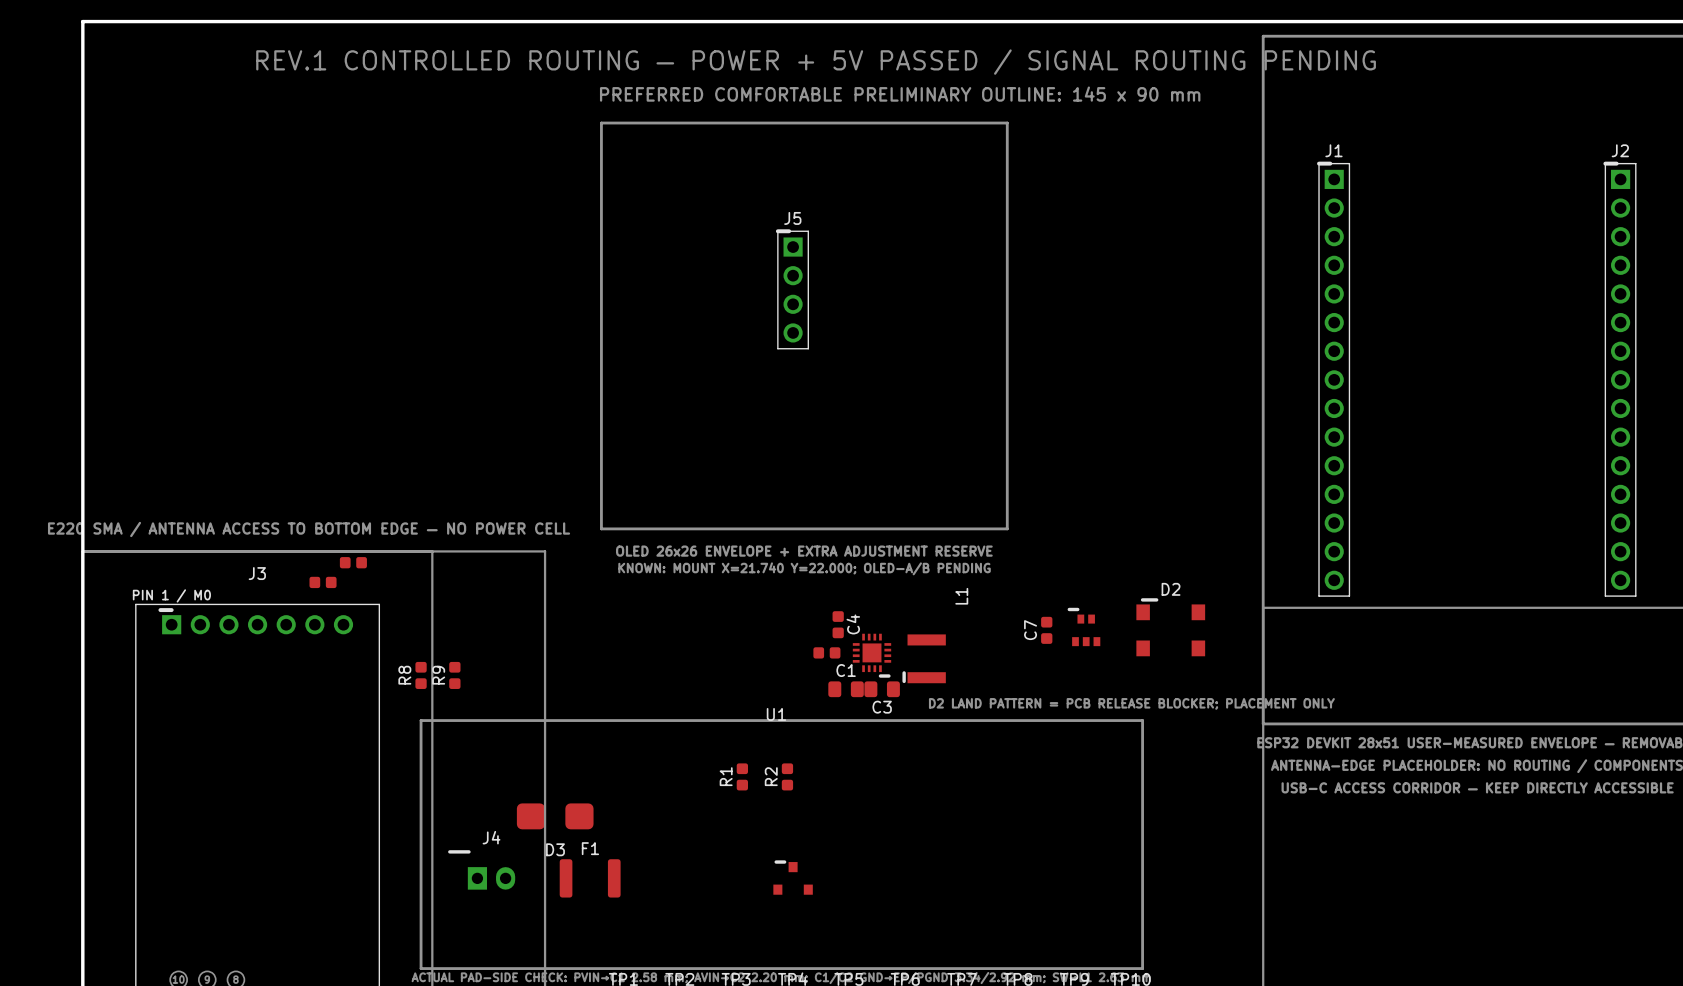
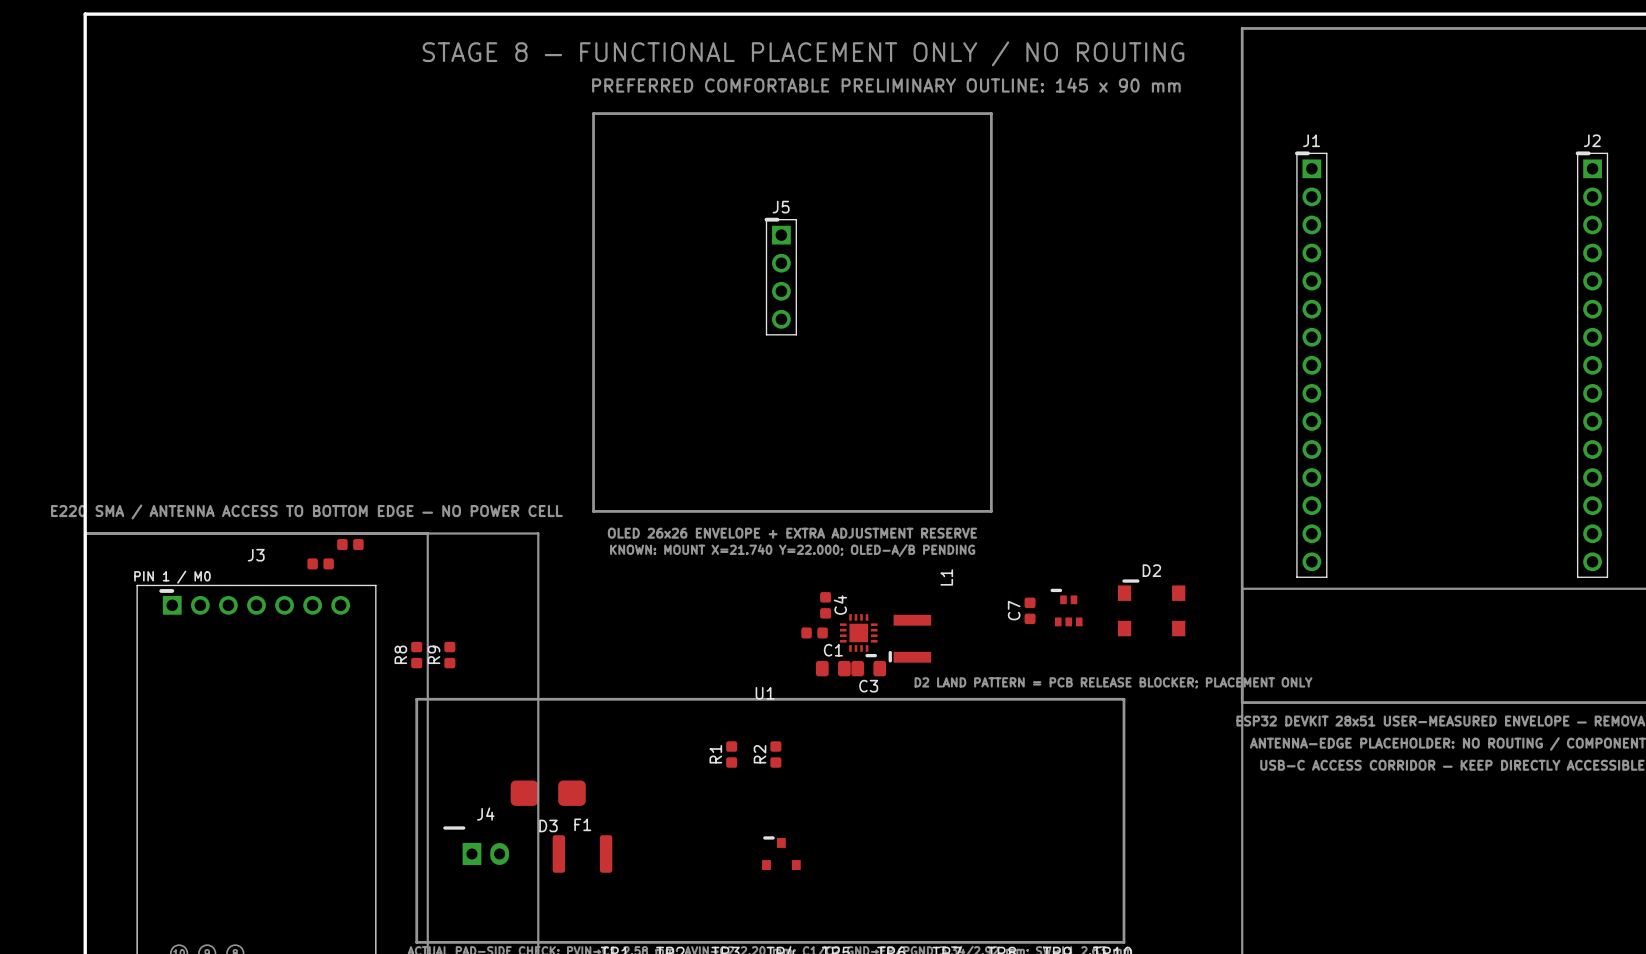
text: REV.1 CONTROLLED ROUTING — POWER + 5V PASSED / SIGNAL ROUTING PENDING (816, 62) -> STAGE 8 — FUNCTIONAL PLACEMENT ONLY / NO ROUTING (803, 53)

